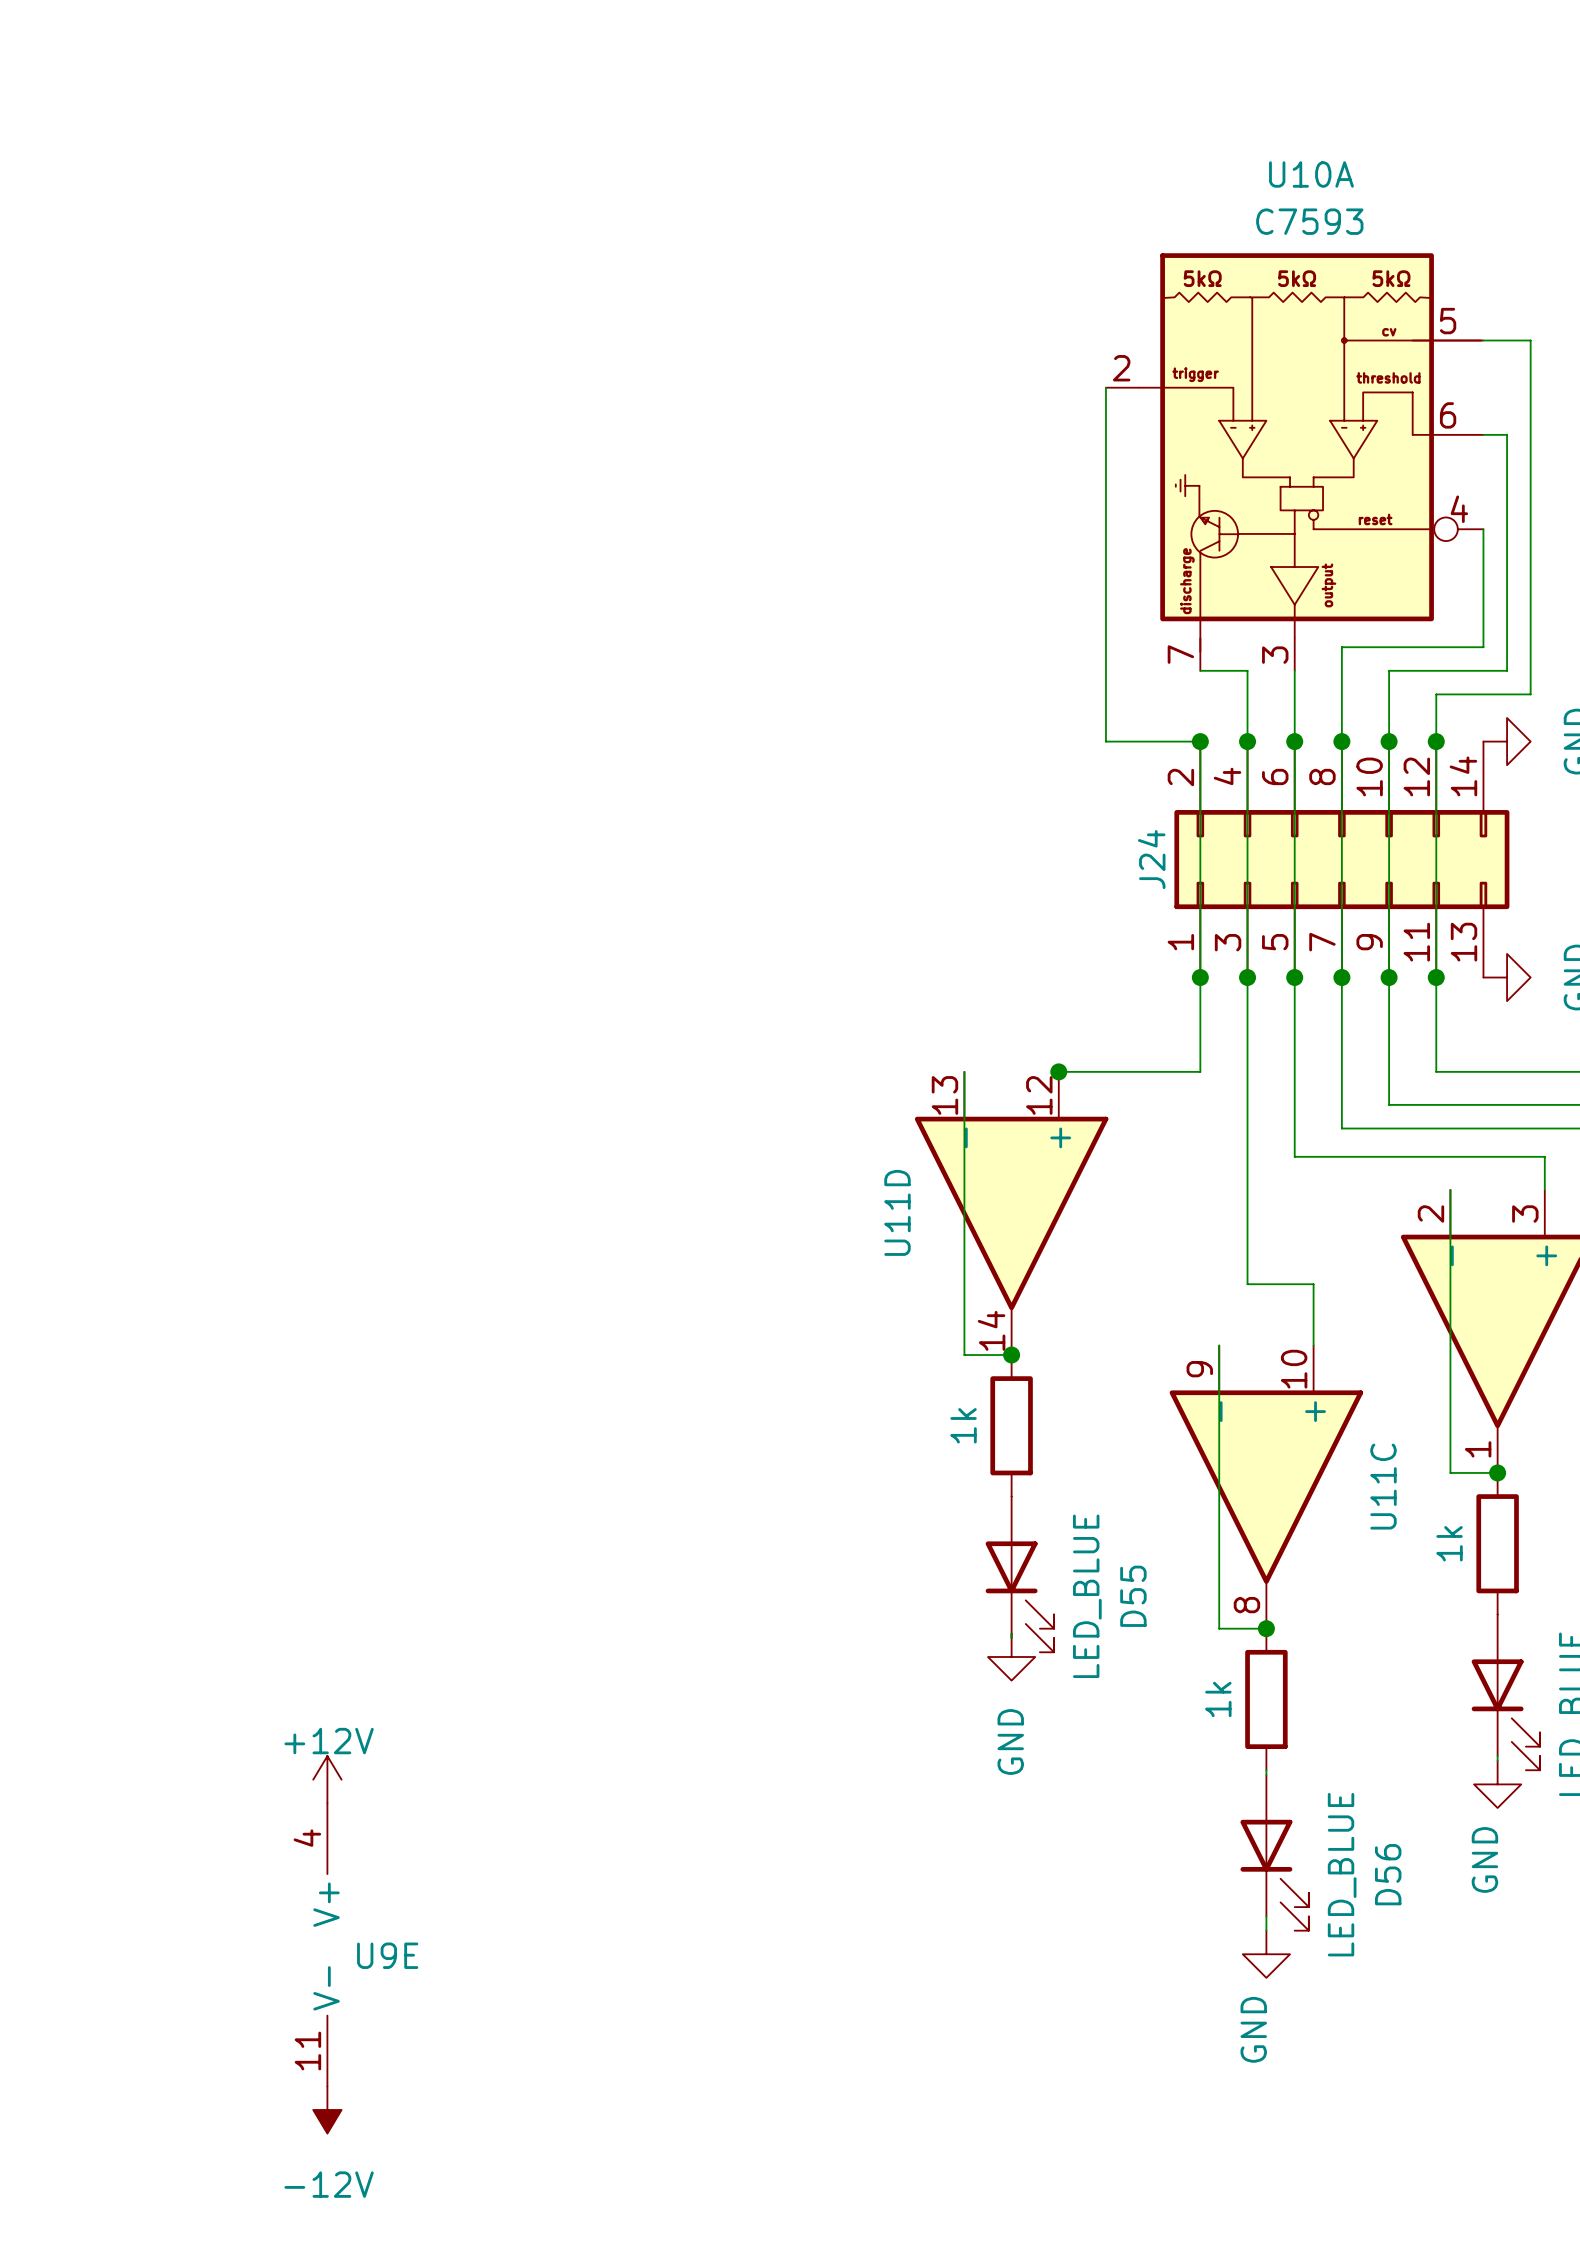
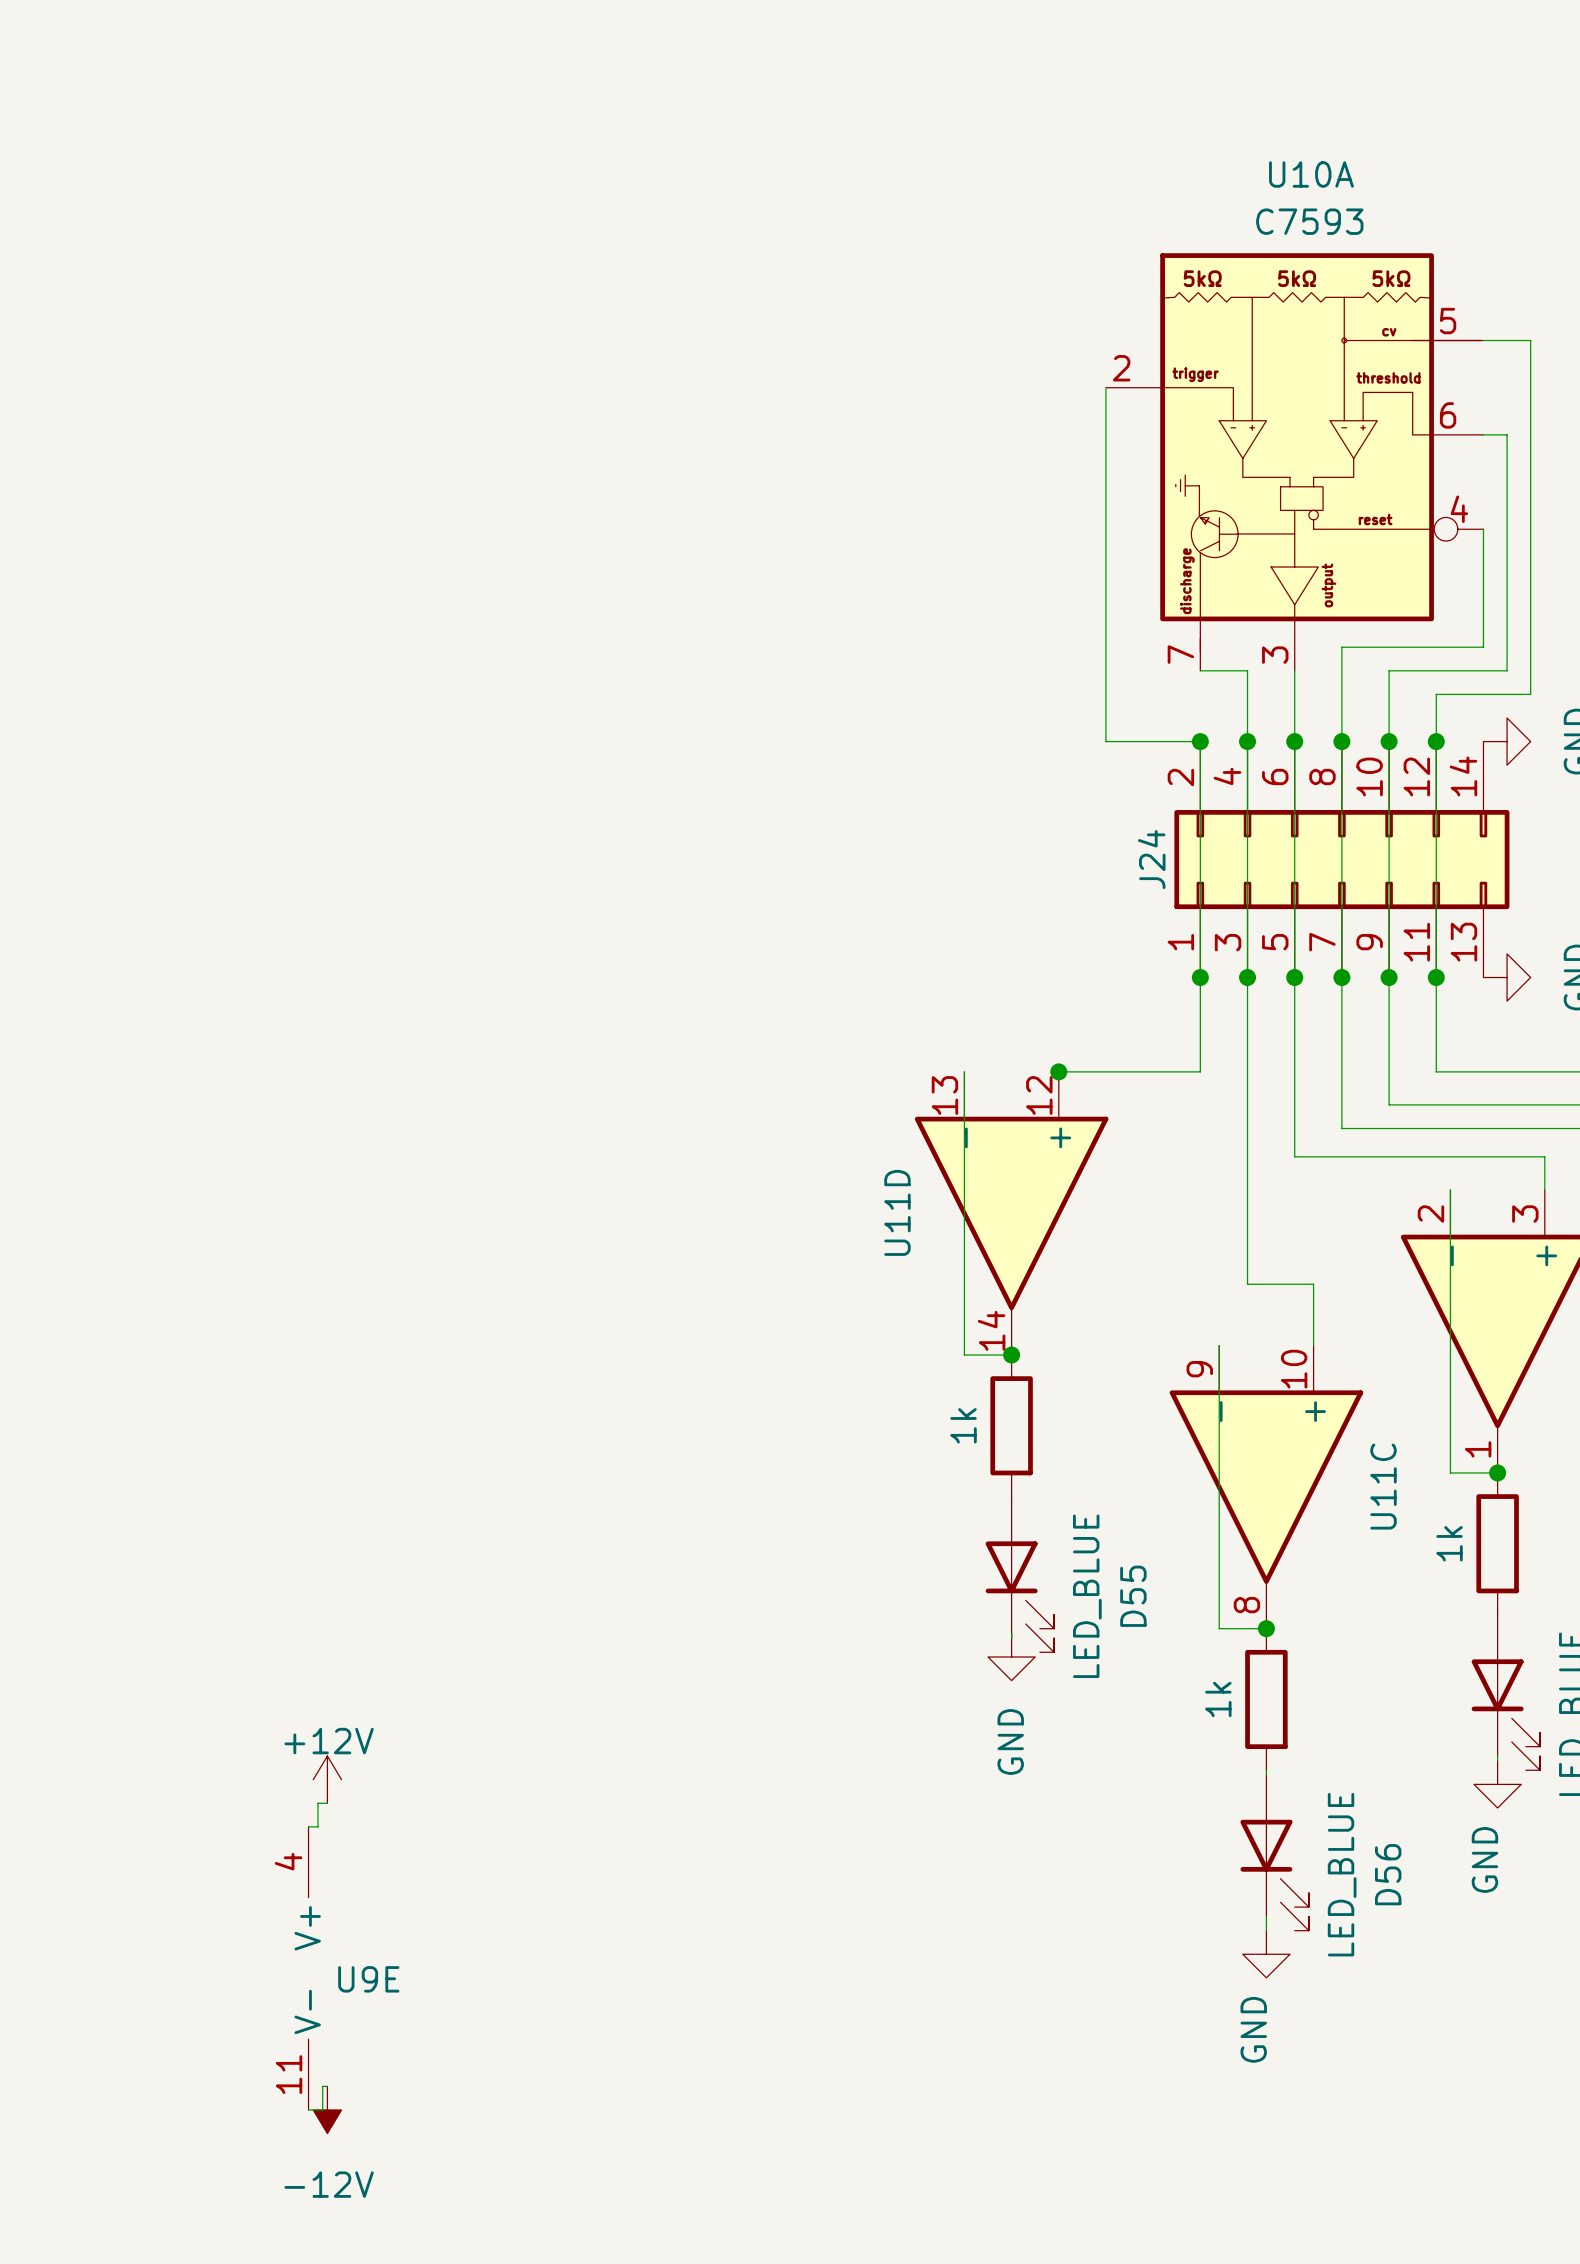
wire: none -> (327, 1803) (317, 1803) (317, 1826) (308, 1826)
U9E position: (327, 1944) -> (308, 1968)
wire: none -> (327, 2086) (322, 2086) (322, 2109) (308, 2109)

